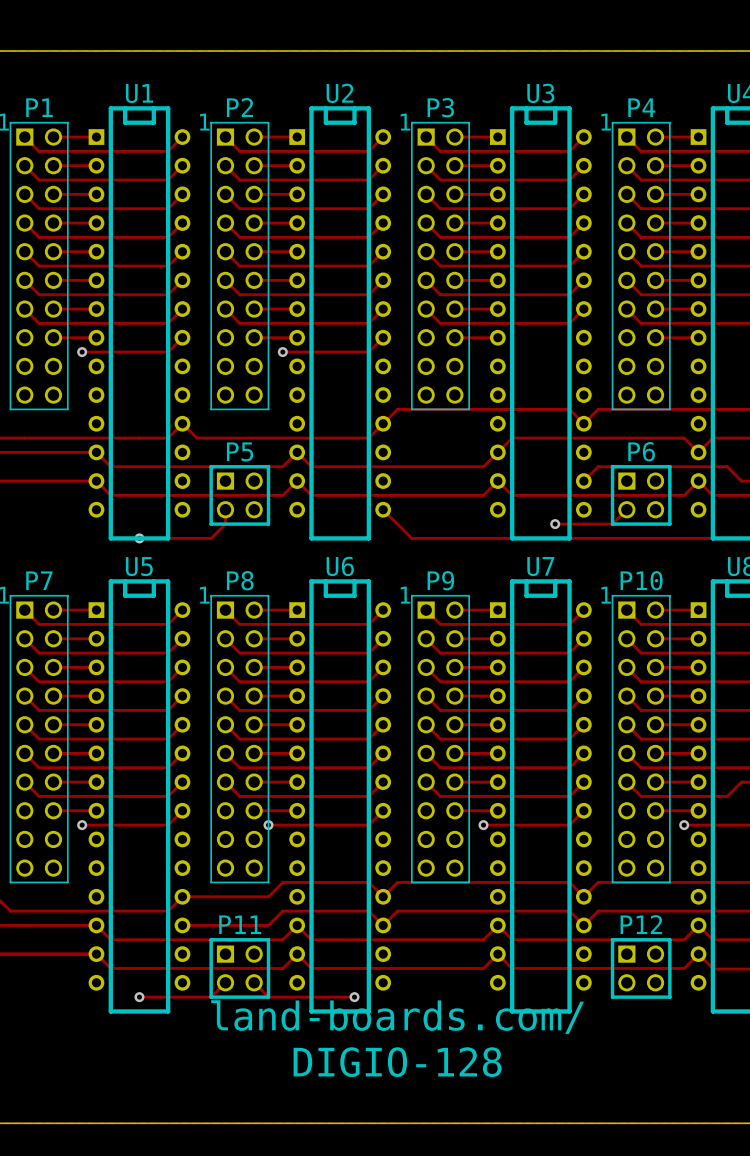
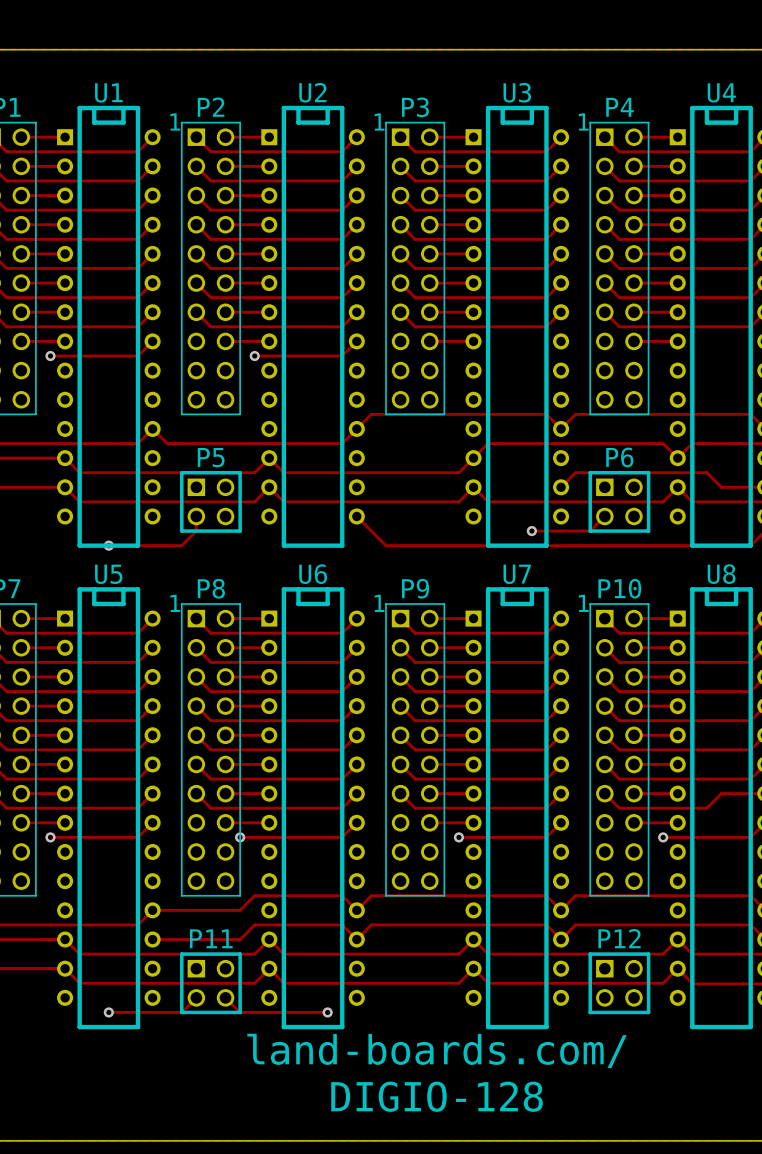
text position: land-boards.com/ (397, 1017) -> land-boards.com/ (437, 1050)
text position: DIGIO-128 (397, 1062) -> DIGIO-128 (437, 1096)

